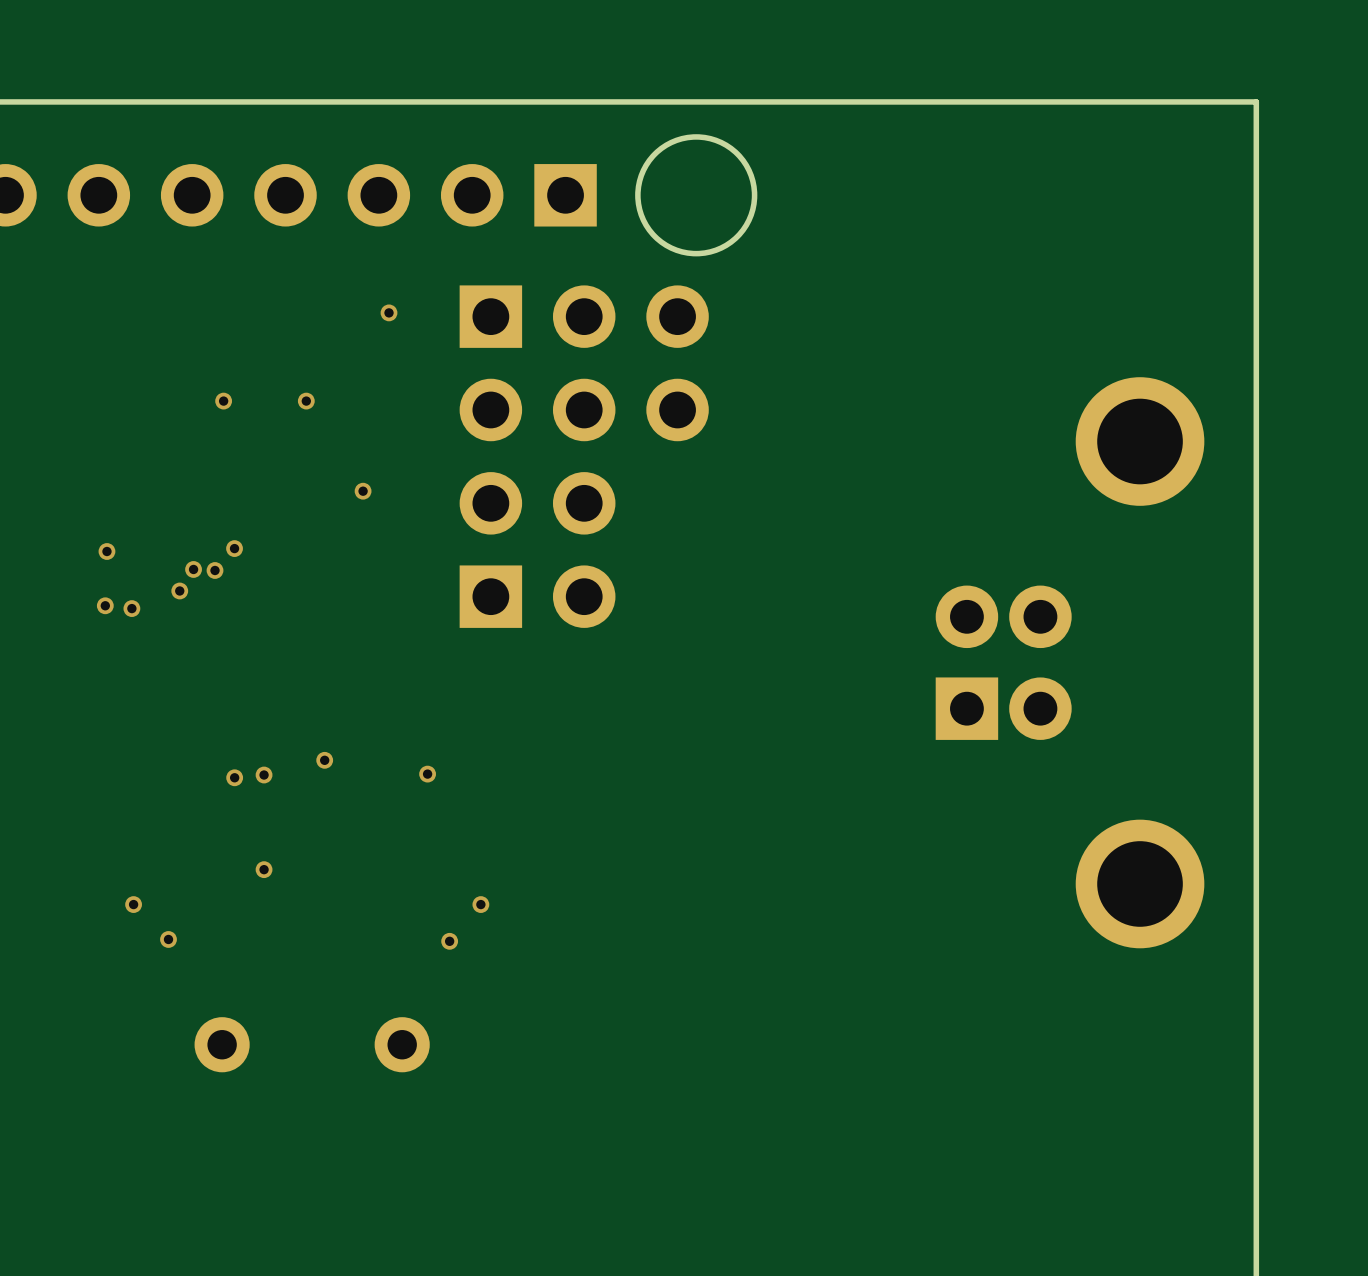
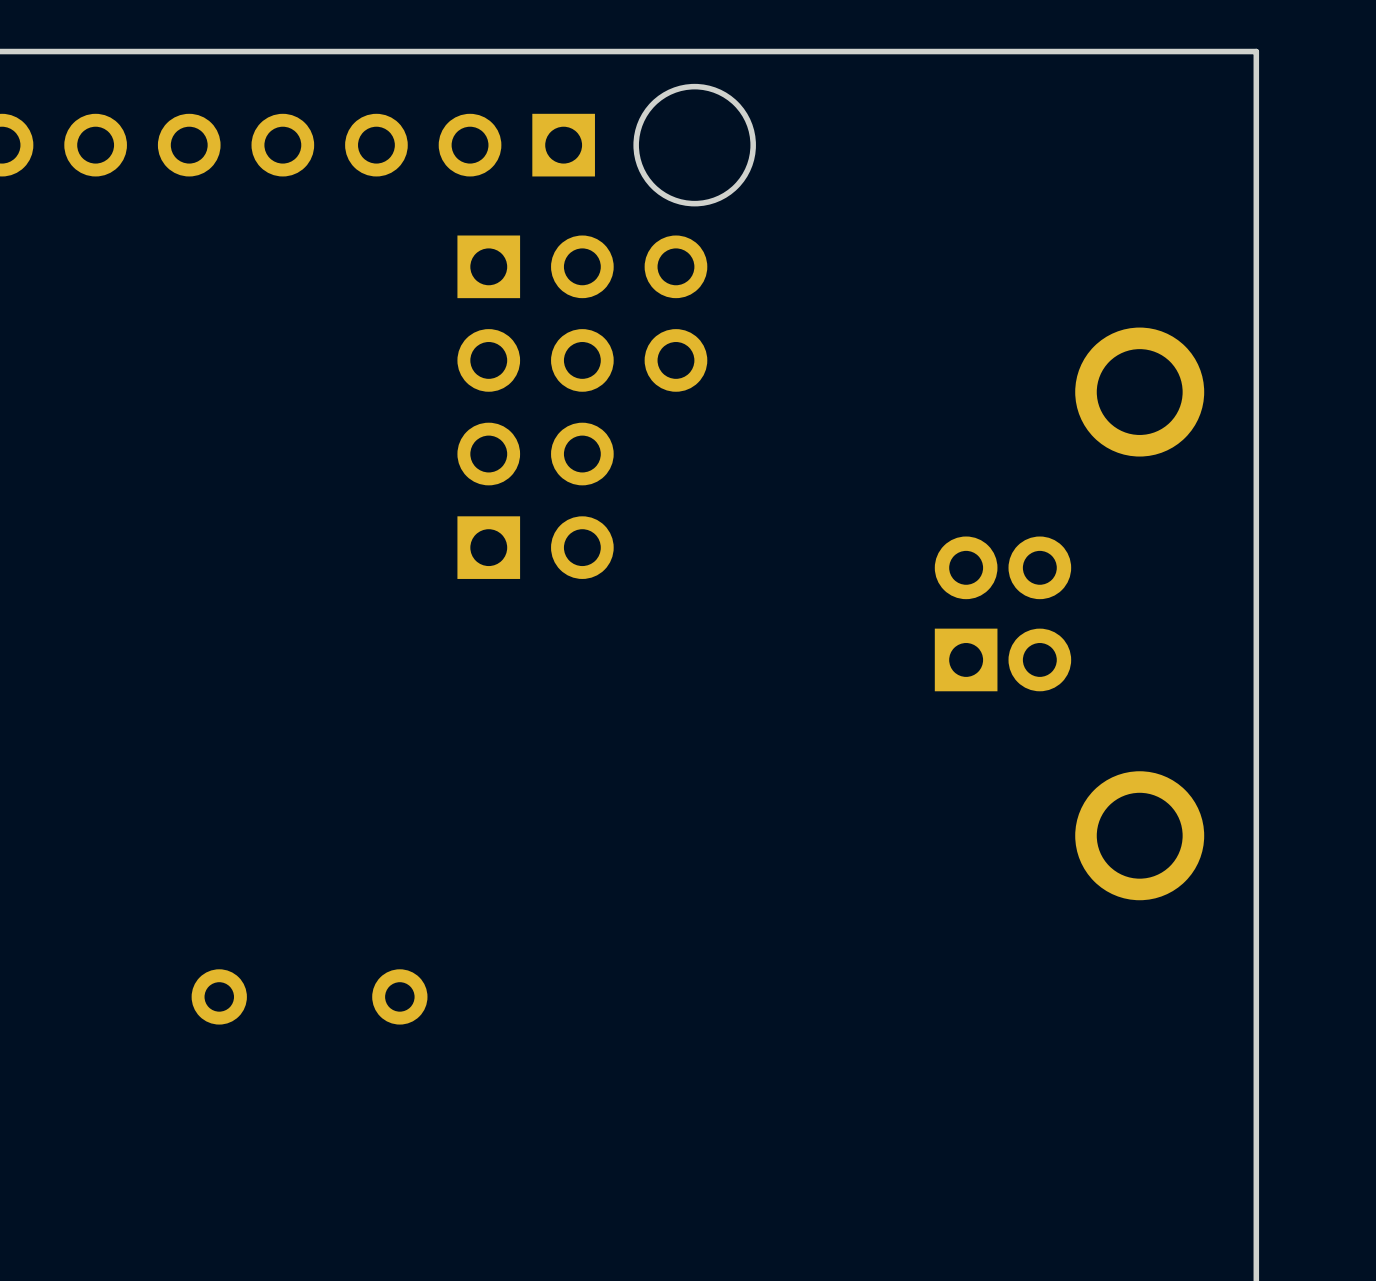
via: (389, 312) -> none
via: (223, 401) -> none
via: (306, 401) -> none
via: (363, 491) -> none
via: (234, 548) -> none
via: (106, 551) -> none
via: (193, 569) -> none
via: (215, 570) -> none
via: (179, 590) -> none
via: (105, 605) -> none
via: (131, 608) -> none
via: (324, 760) -> none
via: (427, 774) -> none
via: (264, 775) -> none
via: (234, 777) -> none
via: (264, 869) -> none
via: (133, 904) -> none
via: (480, 904) -> none
via: (168, 939) -> none
via: (449, 941) -> none

